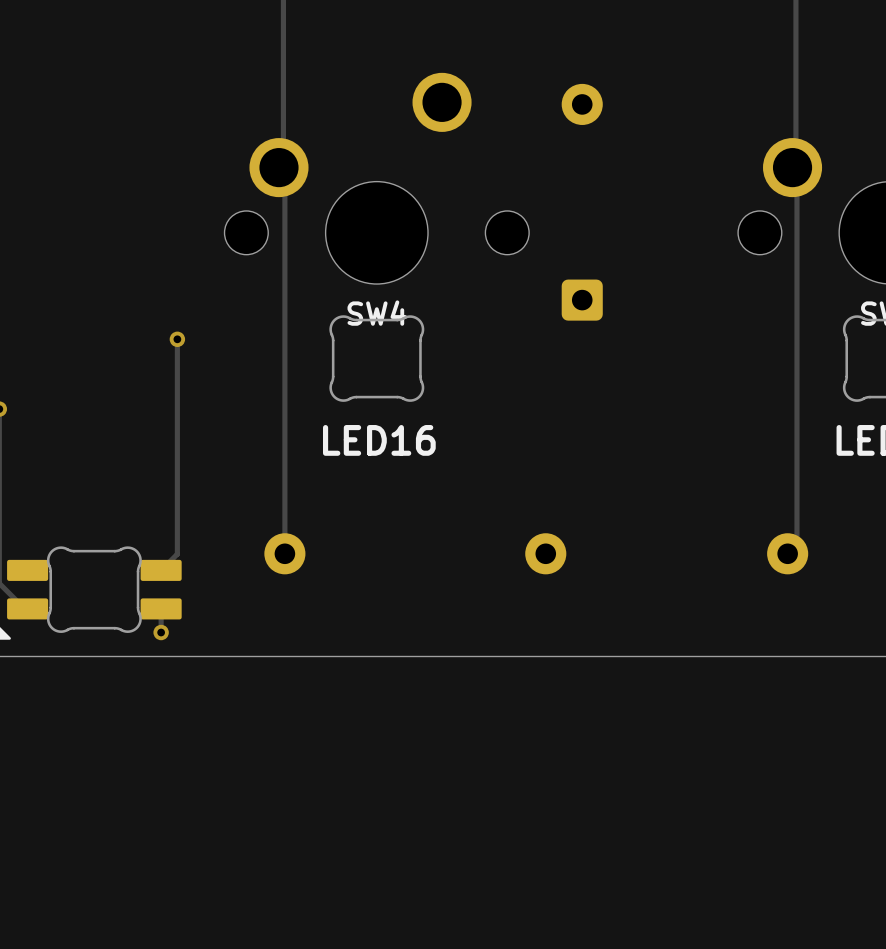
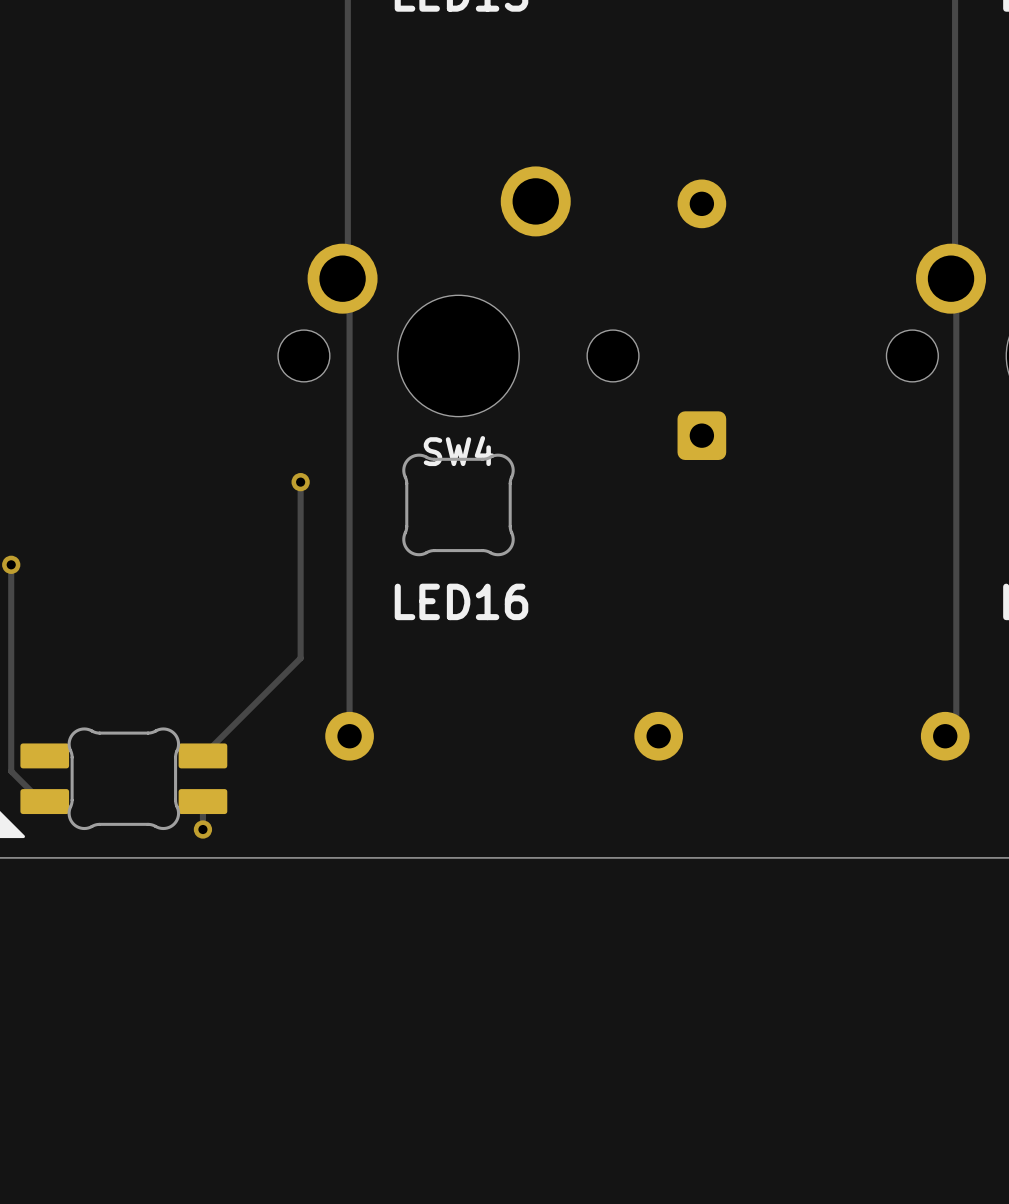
track: (177, 339) (177, 554) -> (300, 482) (300, 658) (222, 736)
via position: (177, 339) -> (300, 482)

